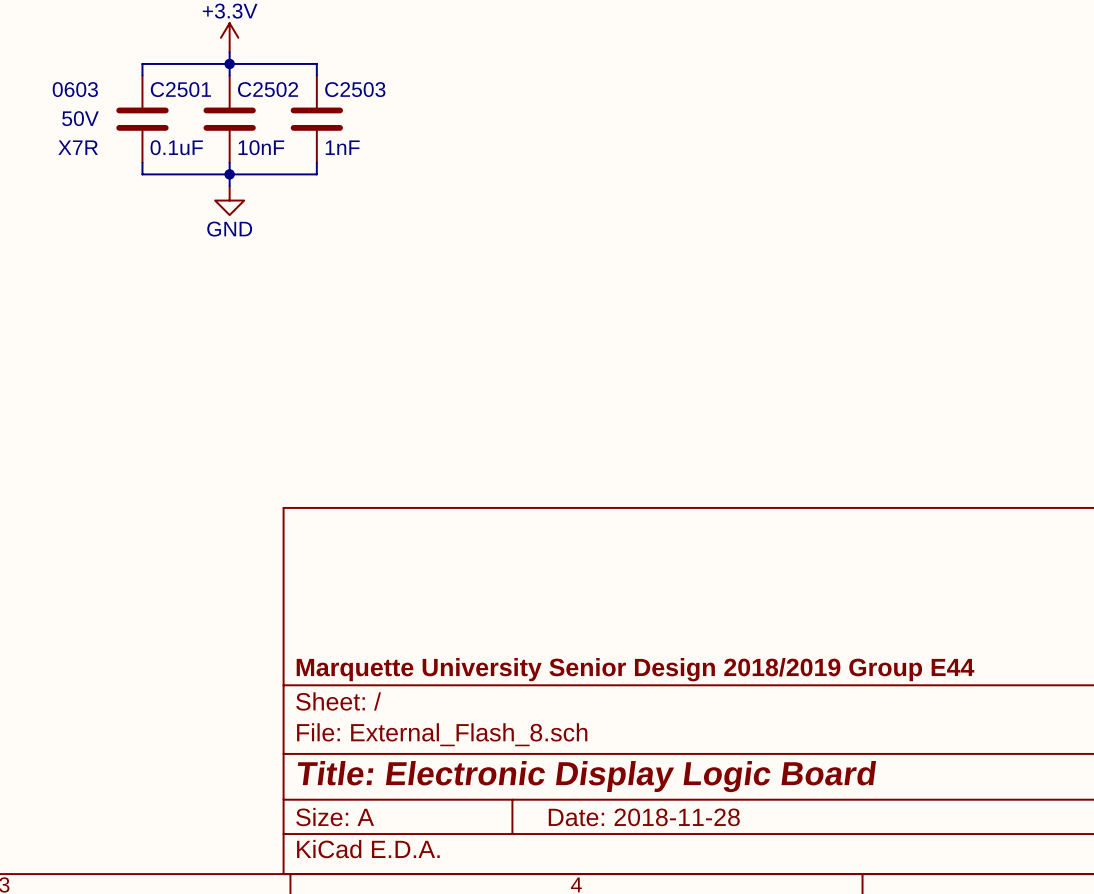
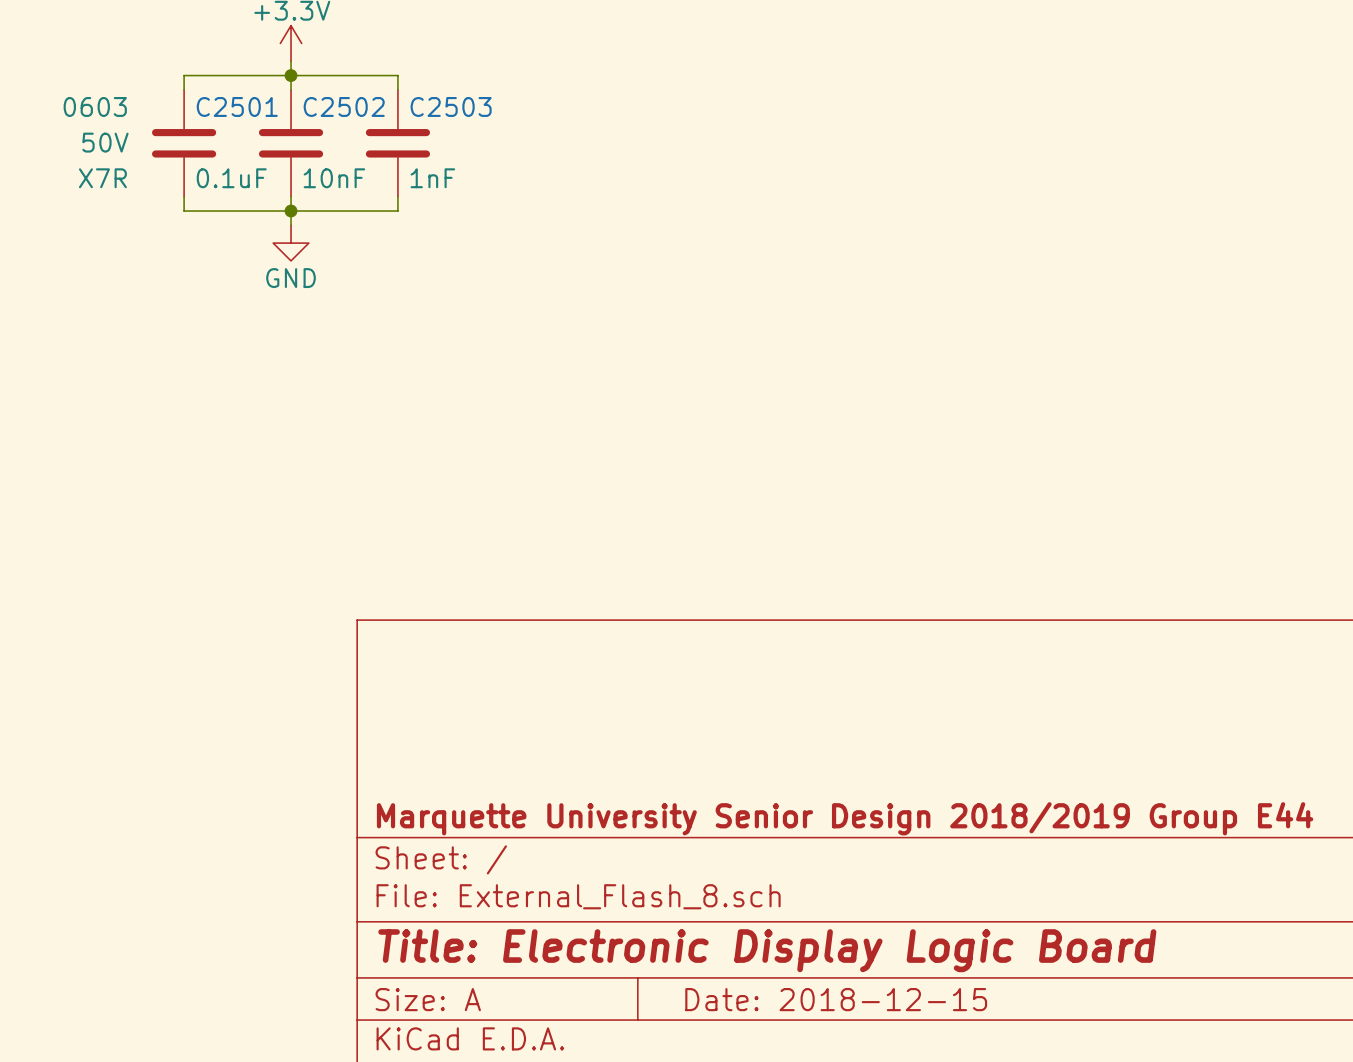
title block: Date: 2018-11-28 (644, 817) -> Date: 2018-12-15 (836, 999)

